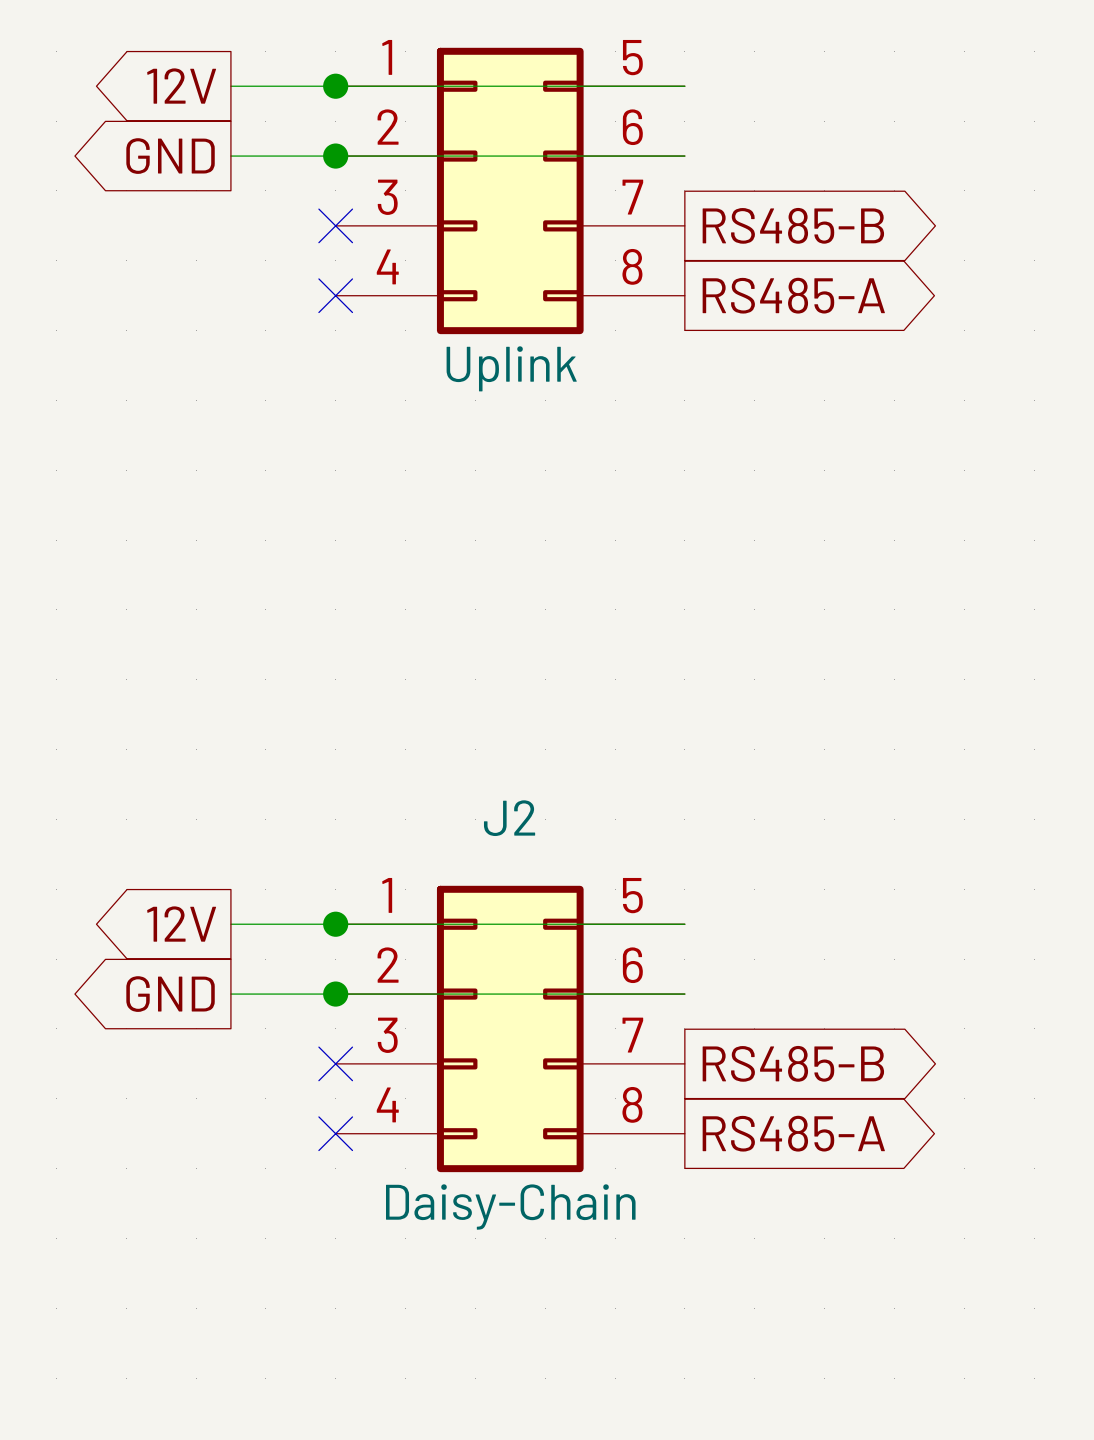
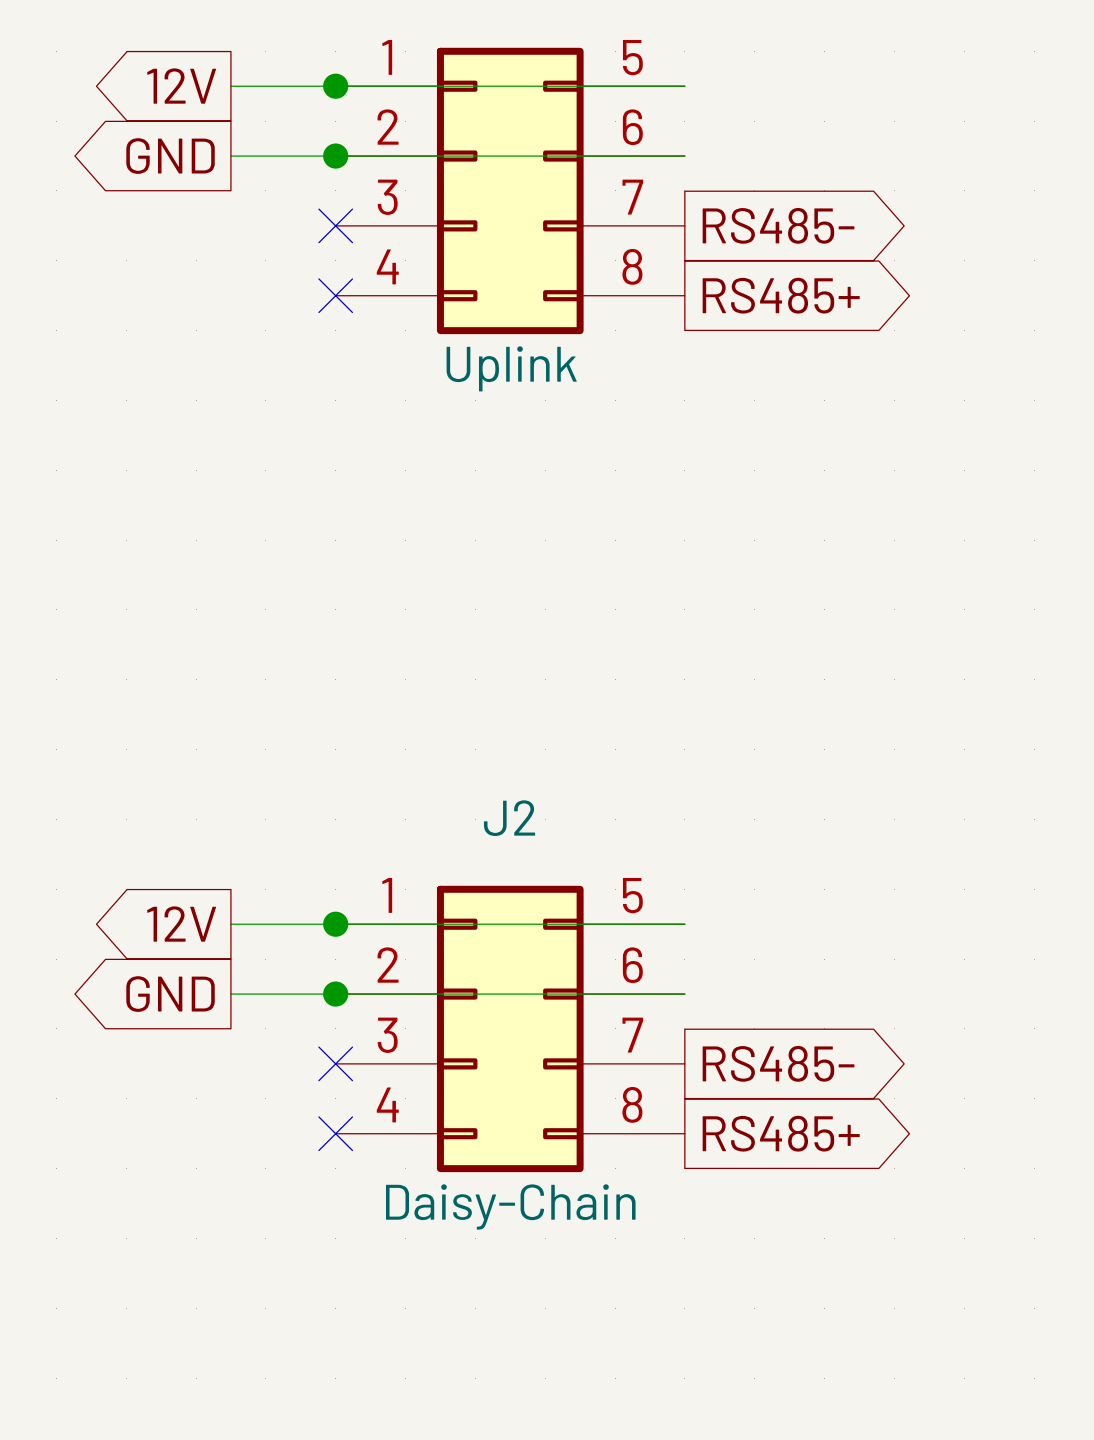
global label: RS485-B (793, 225) -> RS485- (778, 225)
global label: RS485-A (793, 295) -> RS485+ (781, 295)
global label: RS485-B (793, 1063) -> RS485- (778, 1063)
global label: RS485-A (793, 1133) -> RS485+ (781, 1133)

